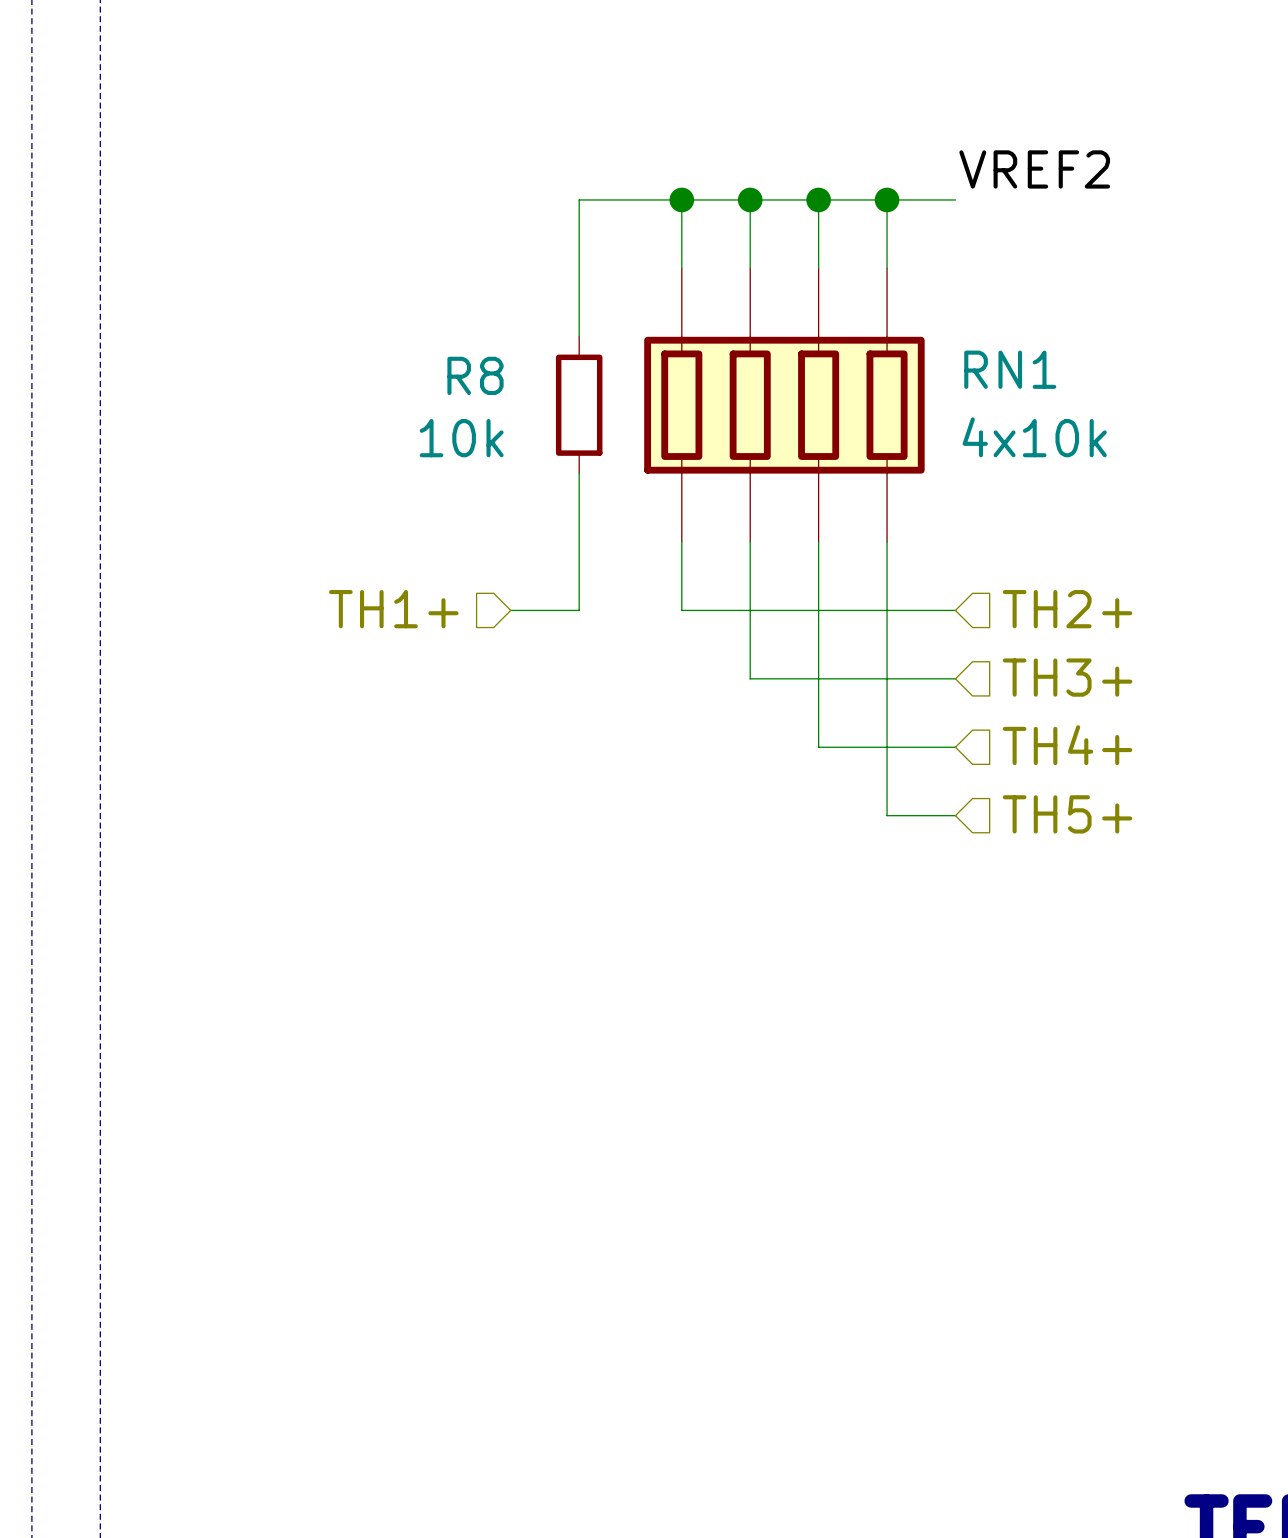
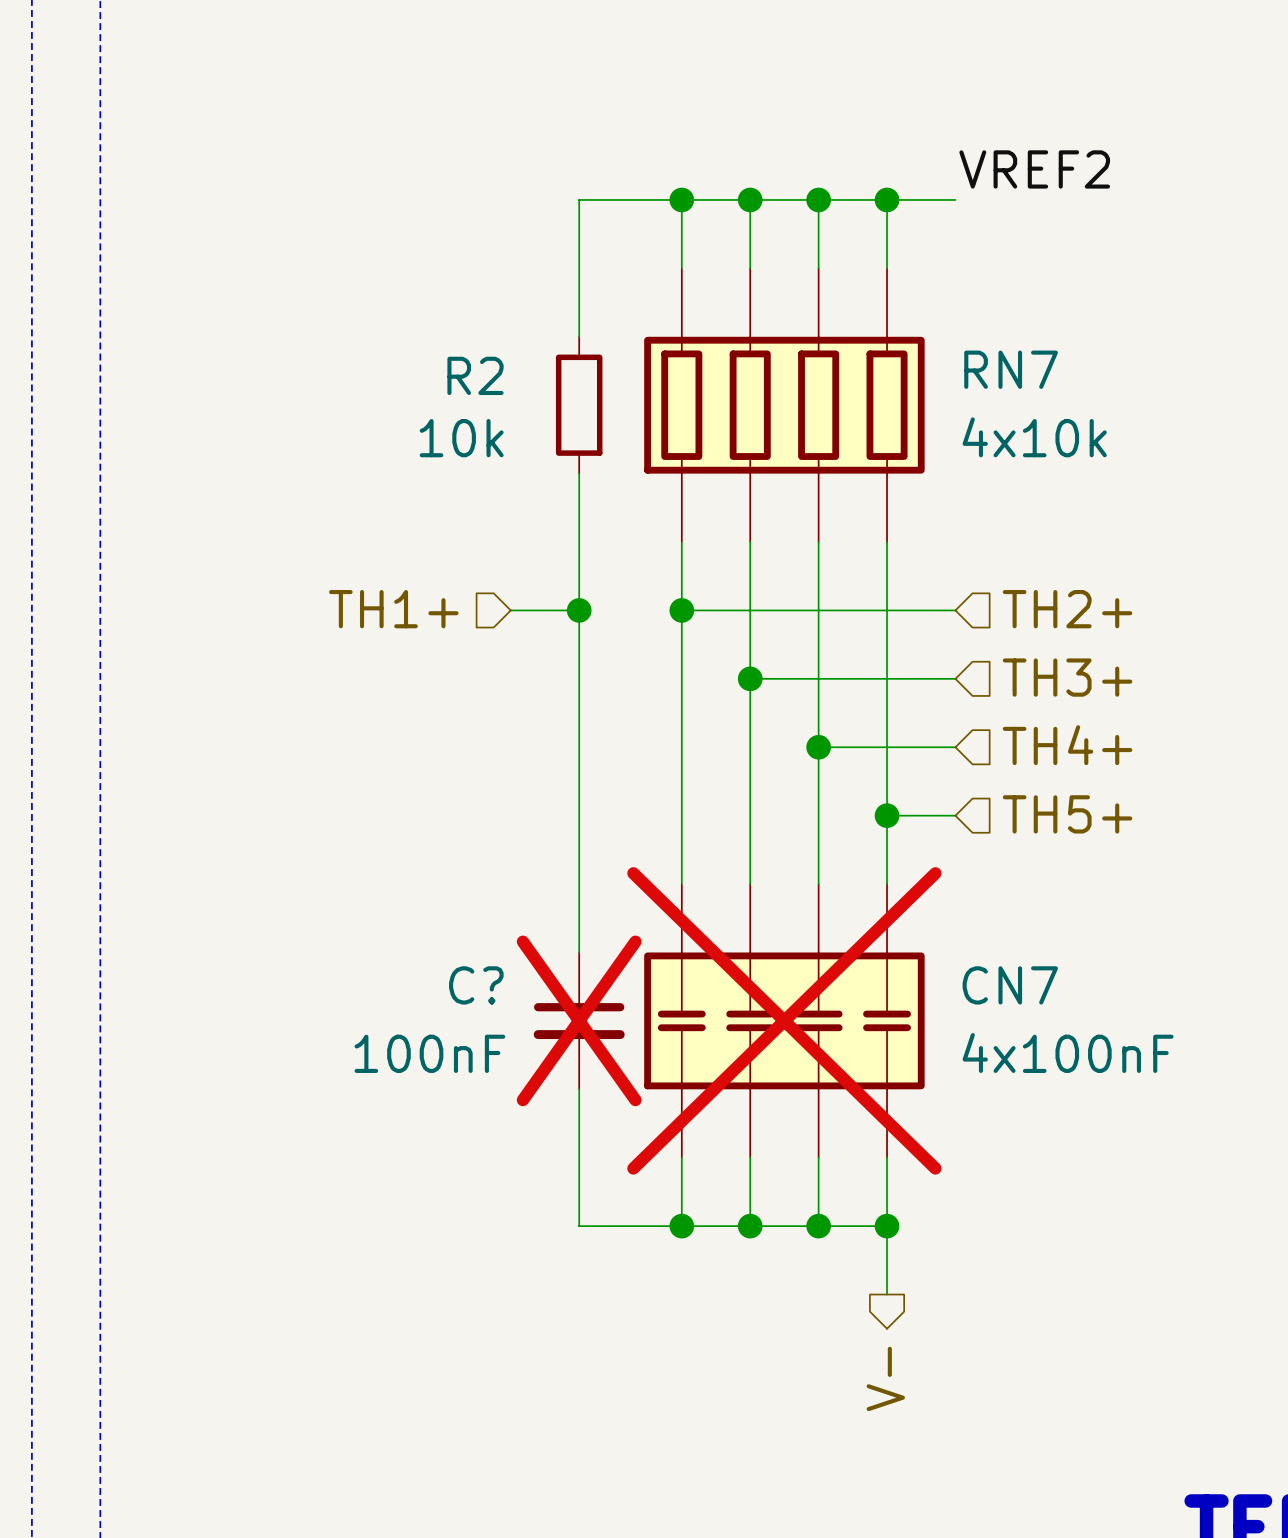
RN1 name: RN1 (1010, 369) -> RN7 (1011, 369)
R8 name: R8 (475, 375) -> R2 (475, 375)
wire: none -> (579, 610) (579, 952)
junction: none -> (579, 610)
wire: none -> (681, 610) (681, 884)
junction: none -> (681, 610)
wire: none -> (750, 678) (750, 884)
junction: none -> (750, 678)
wire: none -> (818, 747) (818, 884)
junction: none -> (818, 747)
wire: none -> (887, 815) (887, 884)
junction: none -> (887, 815)
C?: none -> 100nF (579, 1020)
CN7: none -> 4x100nF (784, 1020)
wire: none -> (579, 1089) (579, 1226) (887, 1226)
wire: none -> (681, 1157) (681, 1226)
wire: none -> (750, 1157) (750, 1226)
wire: none -> (818, 1157) (818, 1226)
wire: none -> (887, 1157) (887, 1294)
junction: none -> (681, 1226)
junction: none -> (750, 1226)
junction: none -> (818, 1226)
junction: none -> (887, 1226)
hierarchical label: none -> V- (885, 1378)

